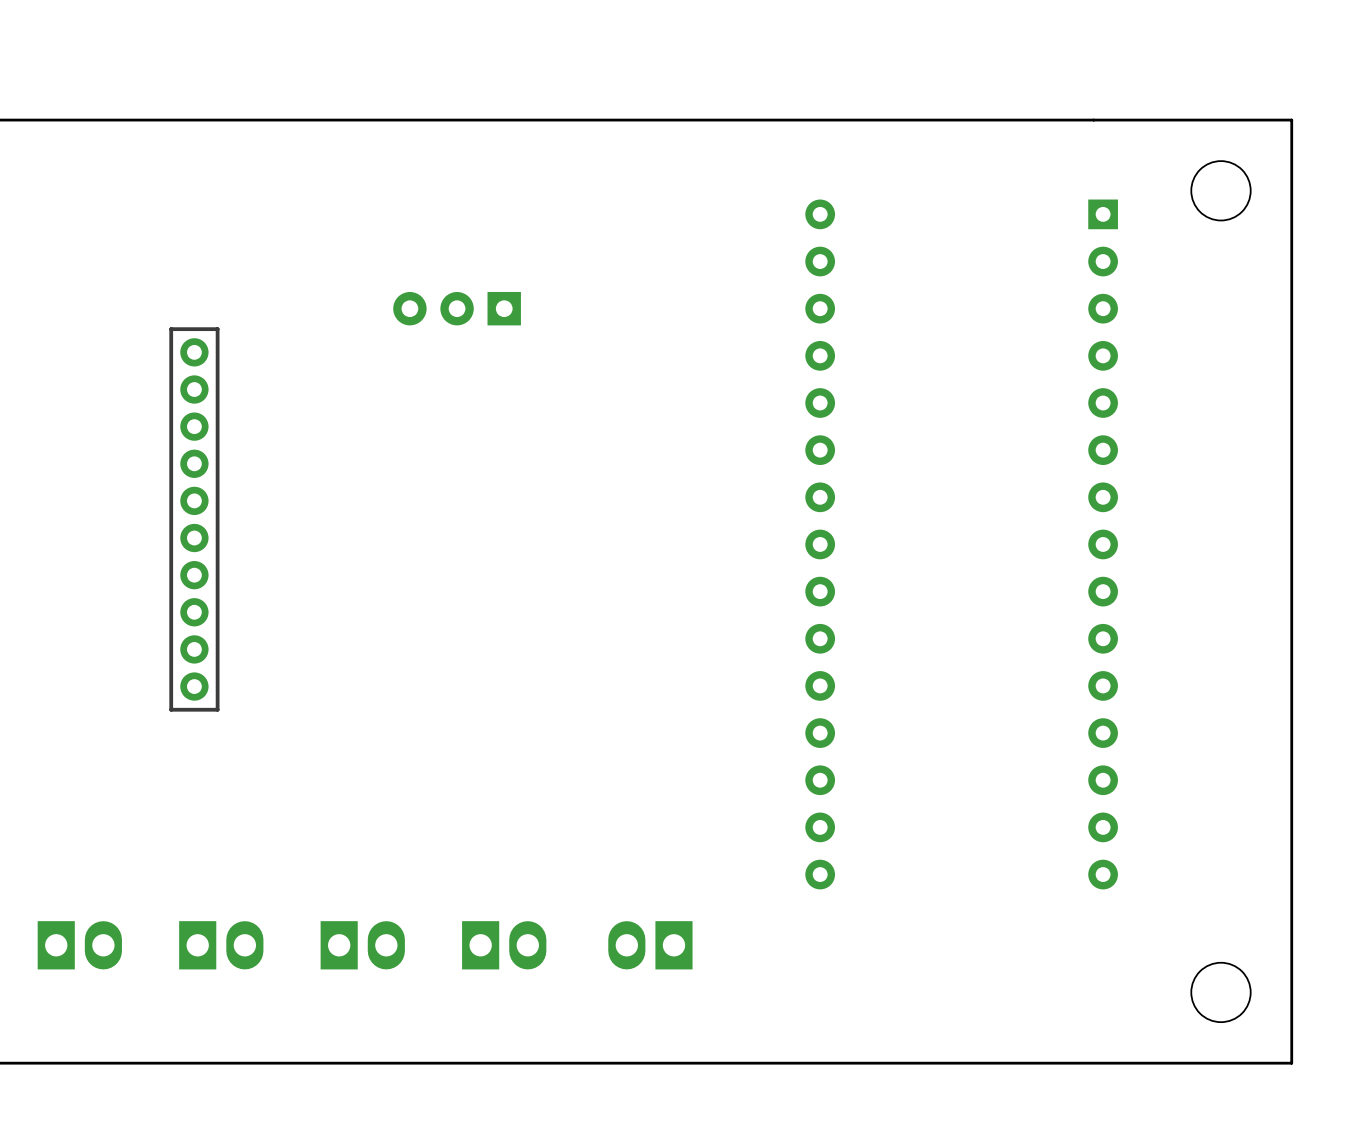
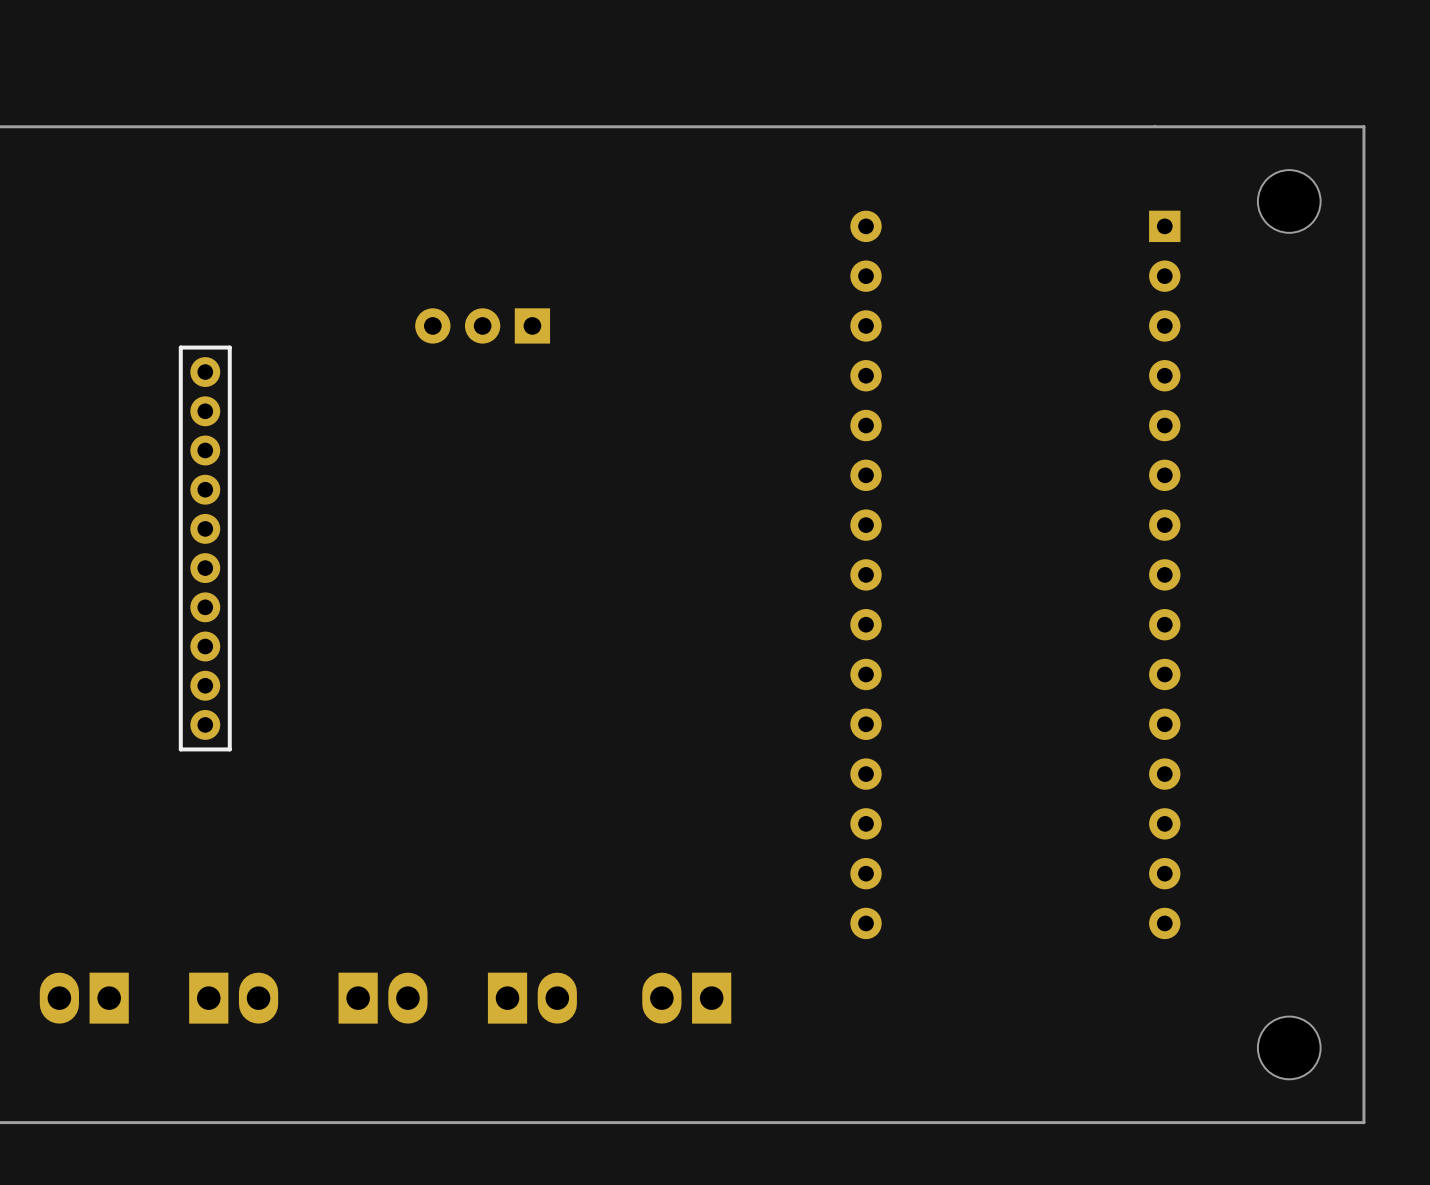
part rotation: 0° (79, 945) -> 180° (84, 998)

